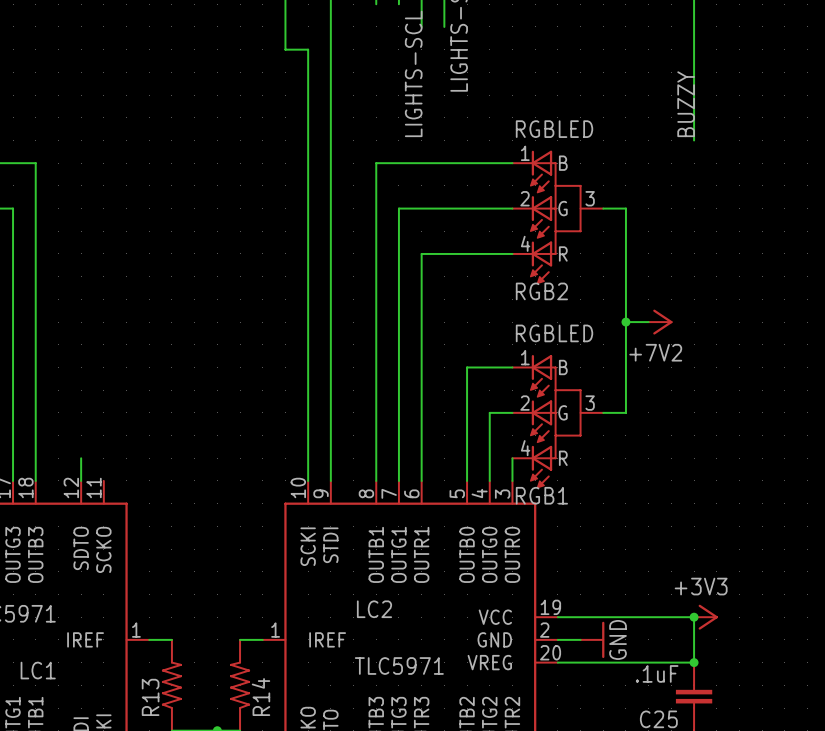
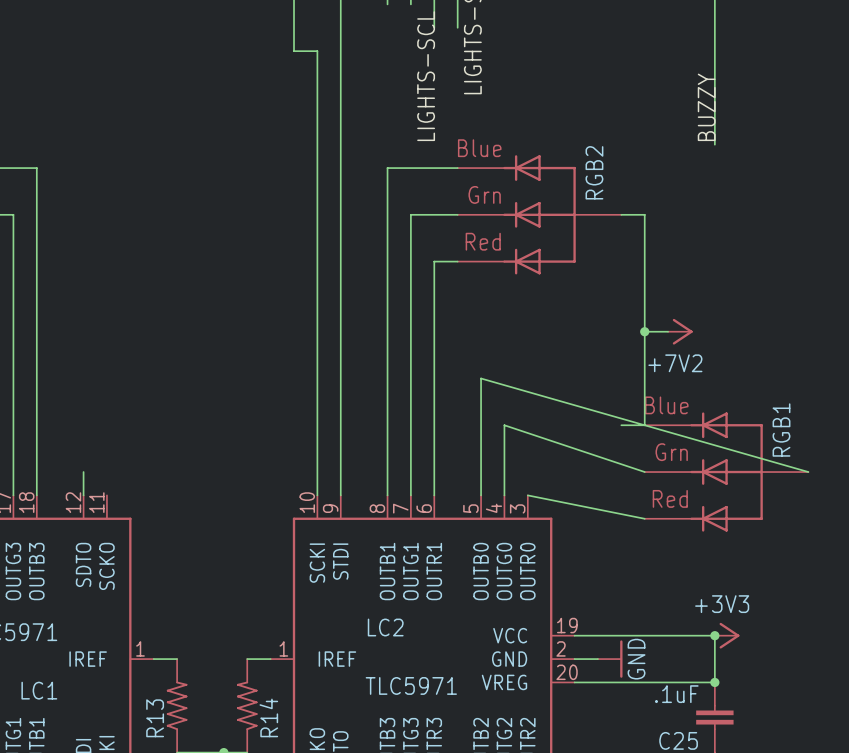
RGB2 value: RGBLED (554, 129) -> none
RGB2 symbol: [512, 150, 604, 285] -> [457, 155, 622, 275]
RGB2 name position: RGB2 (541, 291) -> RGB2 (594, 172)
RGB1 value: RGBLED (554, 333) -> none
RGB1 symbol: [512, 354, 604, 489] -> [644, 412, 809, 532]
wire: (467, 367) (512, 367) -> (481, 378) (808, 472)
wire: (489, 412) (512, 412) -> (504, 425) (644, 472)
wire: (512, 458) (512, 480) -> (644, 518) (527, 495)
RGB1 name position: RGB1 (541, 495) -> RGB1 (781, 430)

